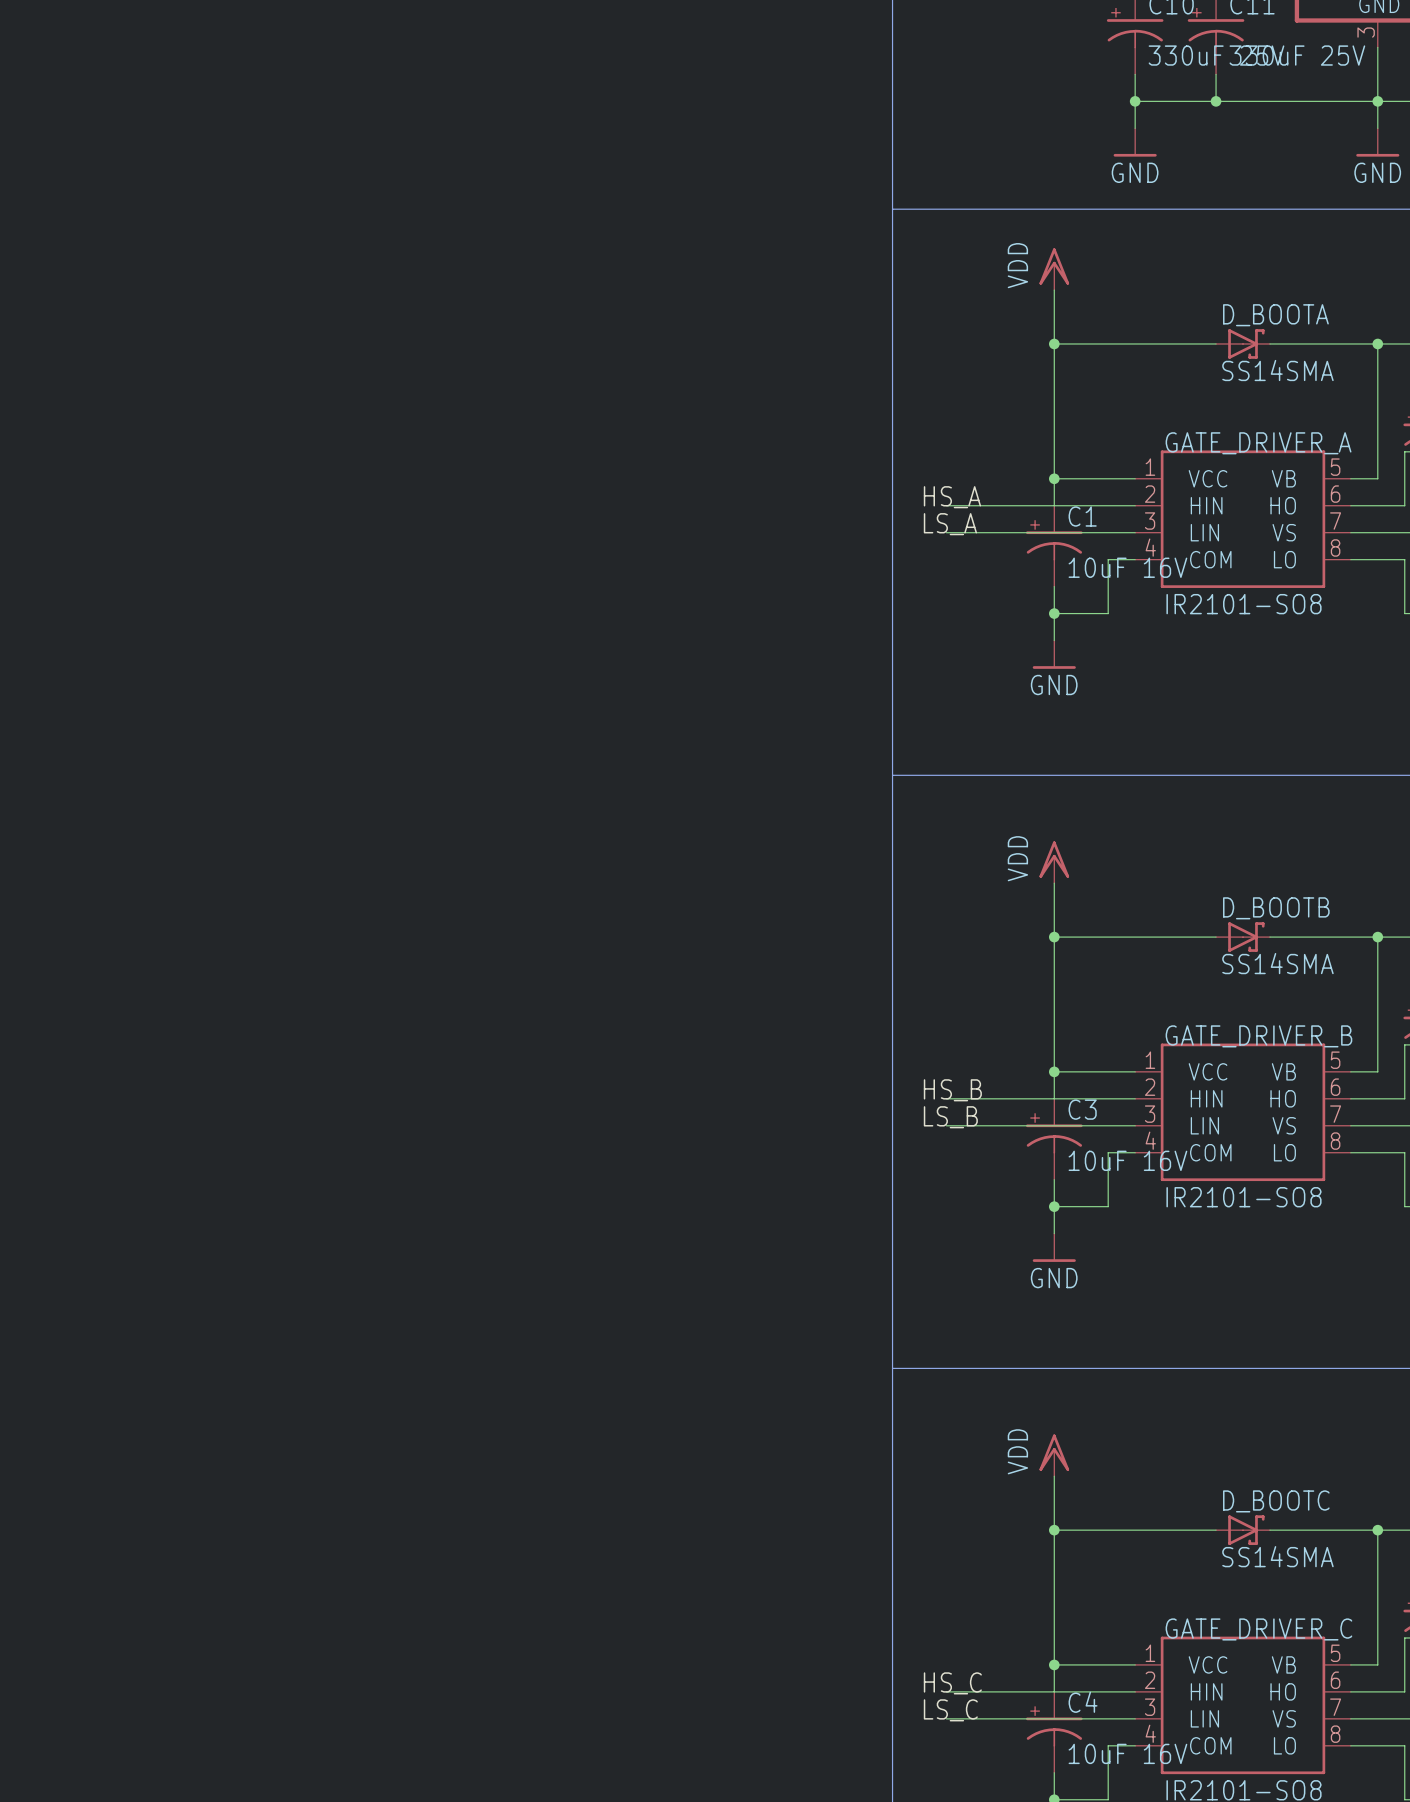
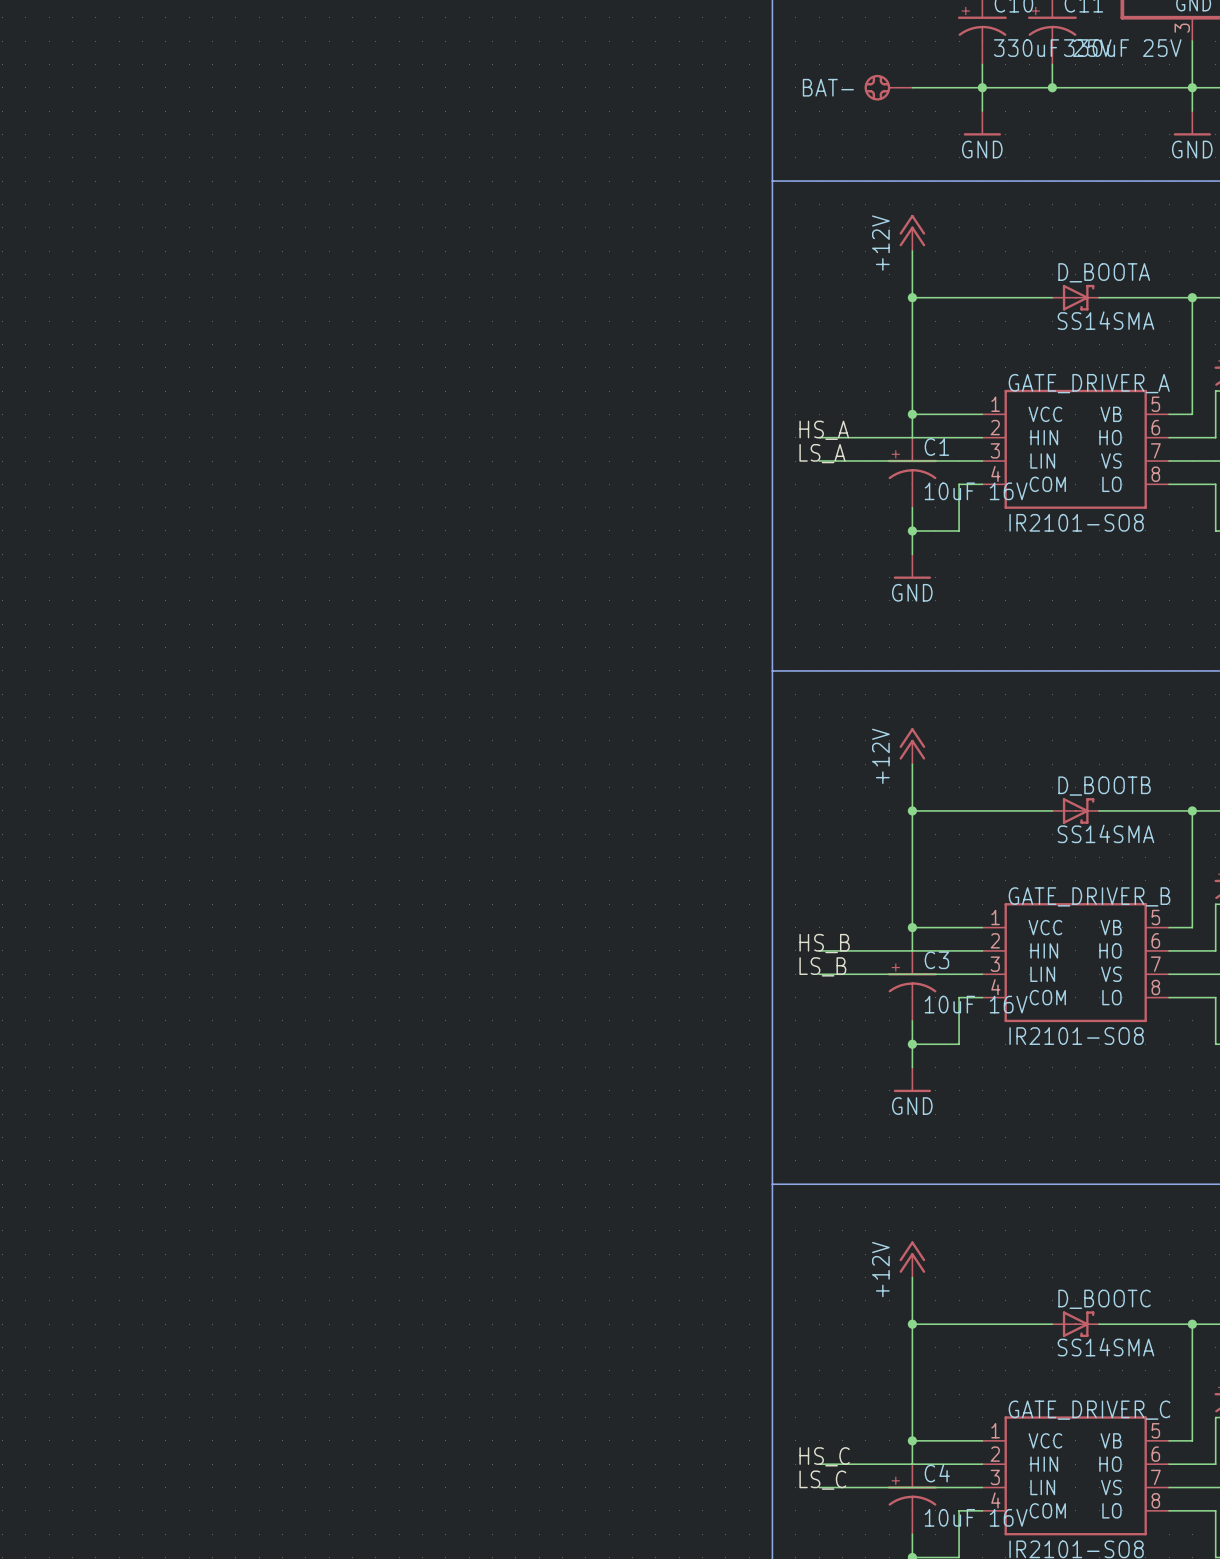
BAT-: none -> (888, 87)
wire: none -> (912, 87) (982, 87)
power symbol: VDD (1054, 269) -> +12V (912, 232)
power symbol: VDD (1054, 862) -> +12V (912, 746)
power symbol: VDD (1054, 1455) -> +12V (912, 1259)

